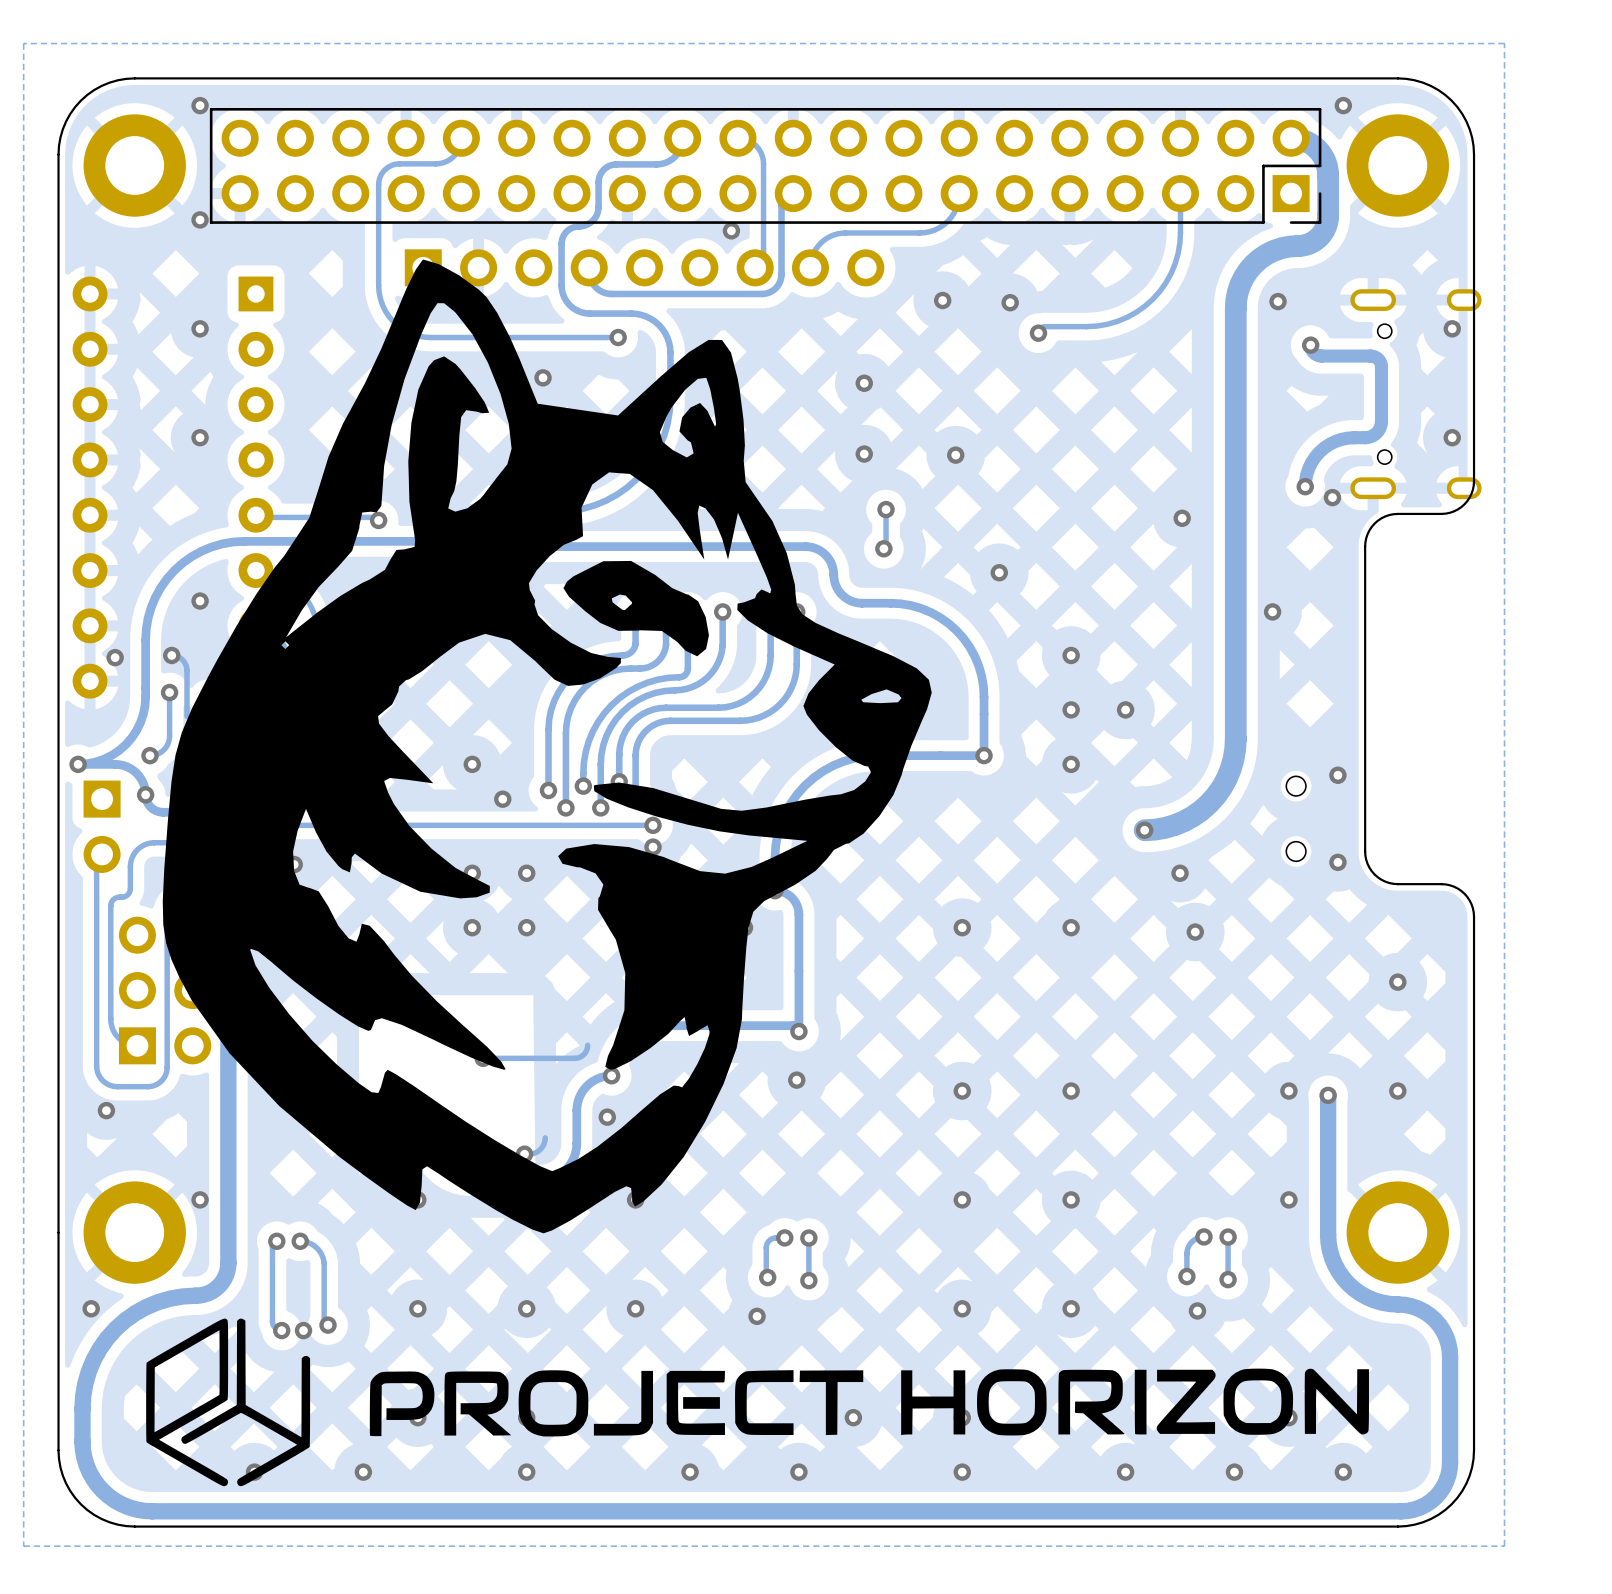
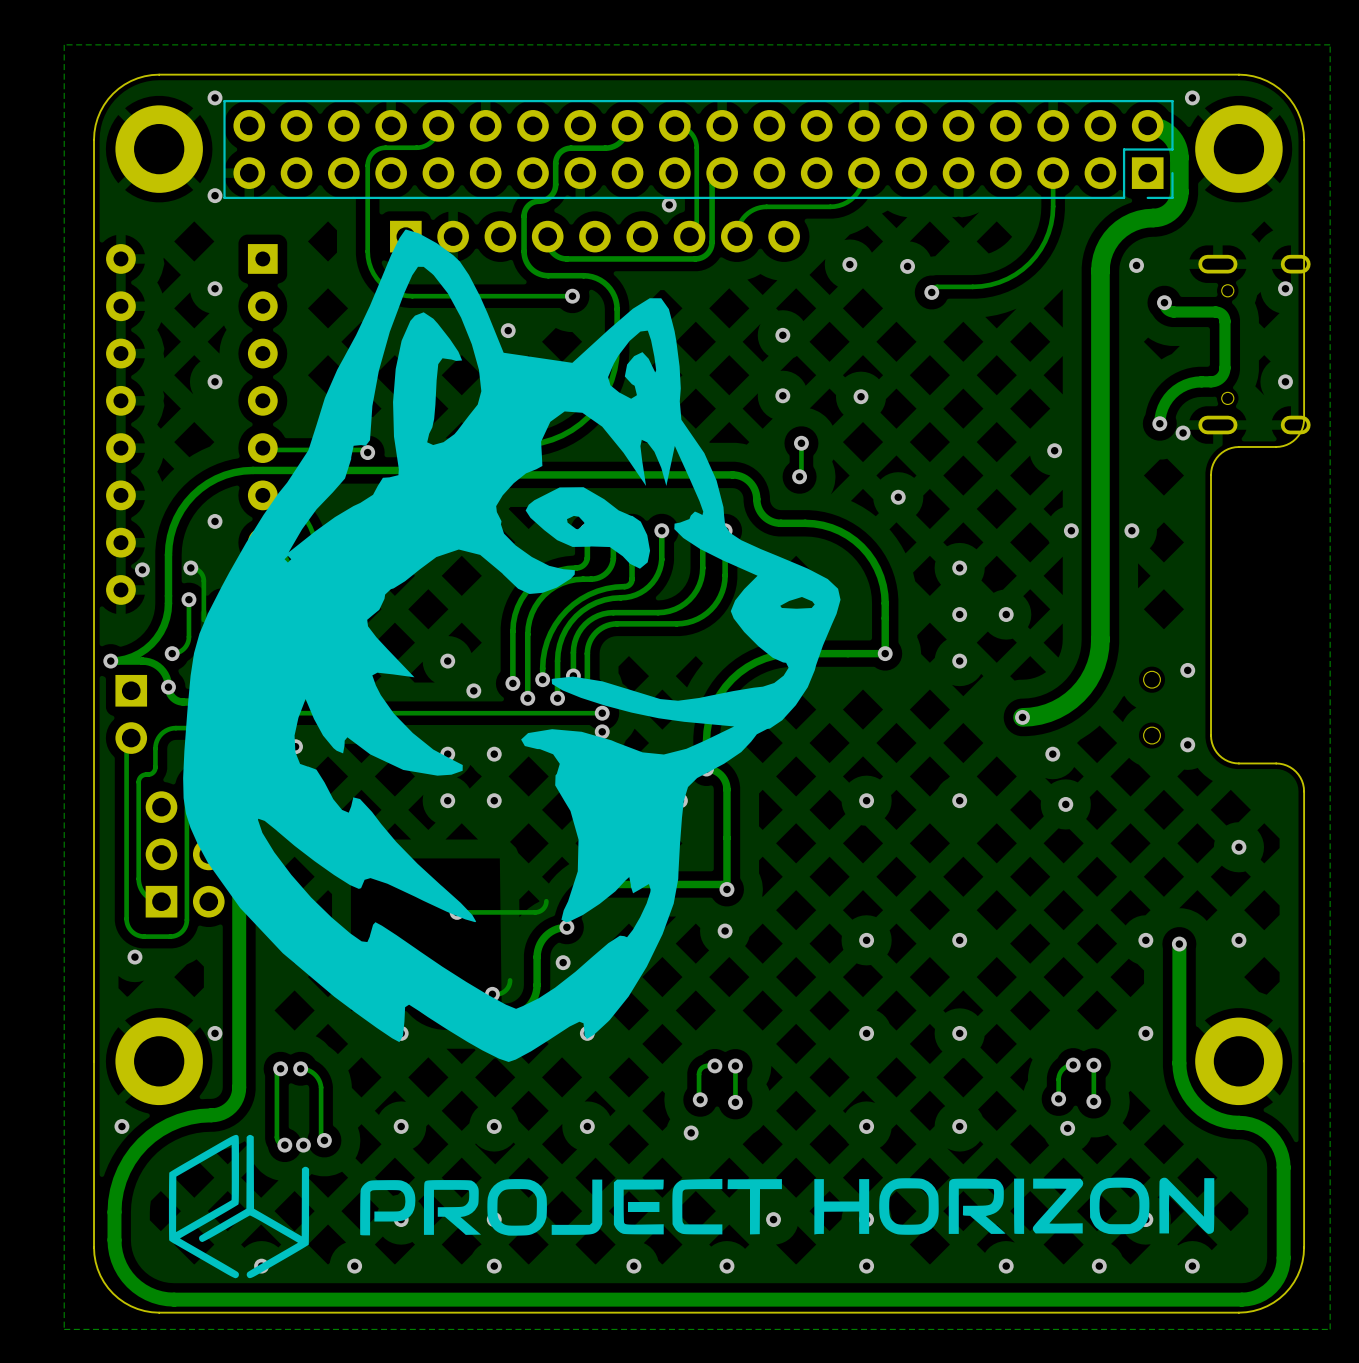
via: none -> (1071, 530)

